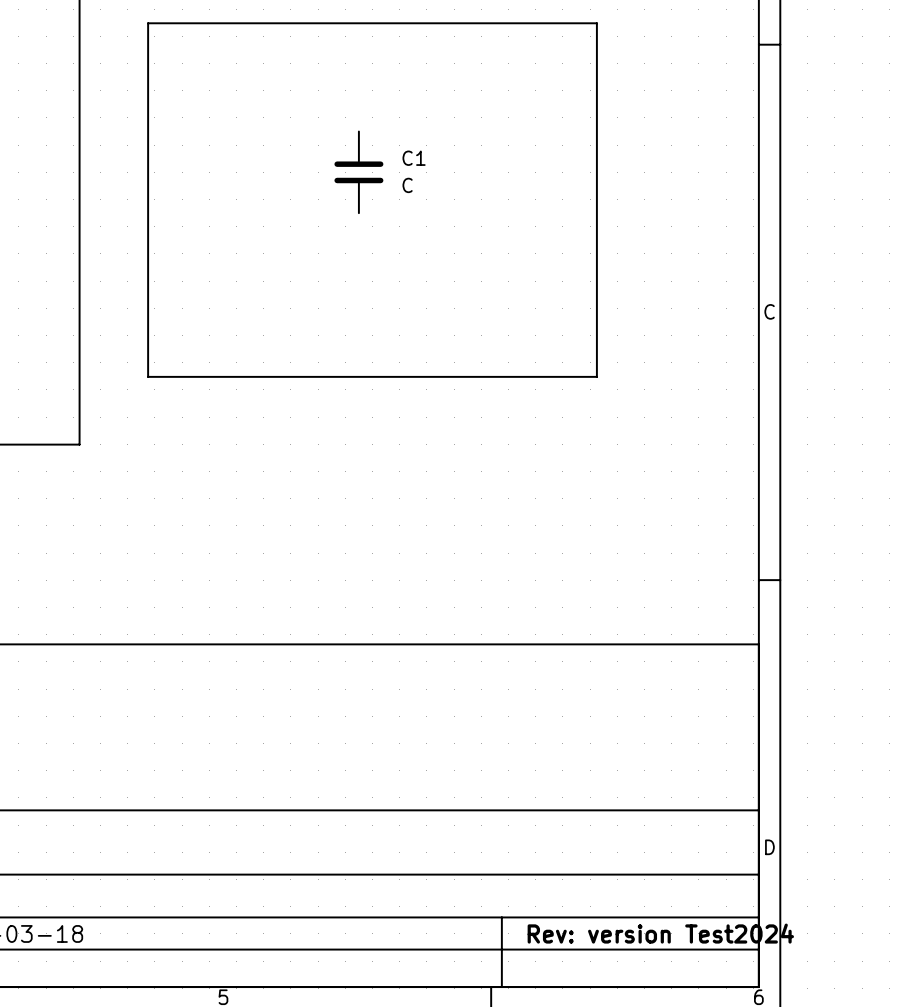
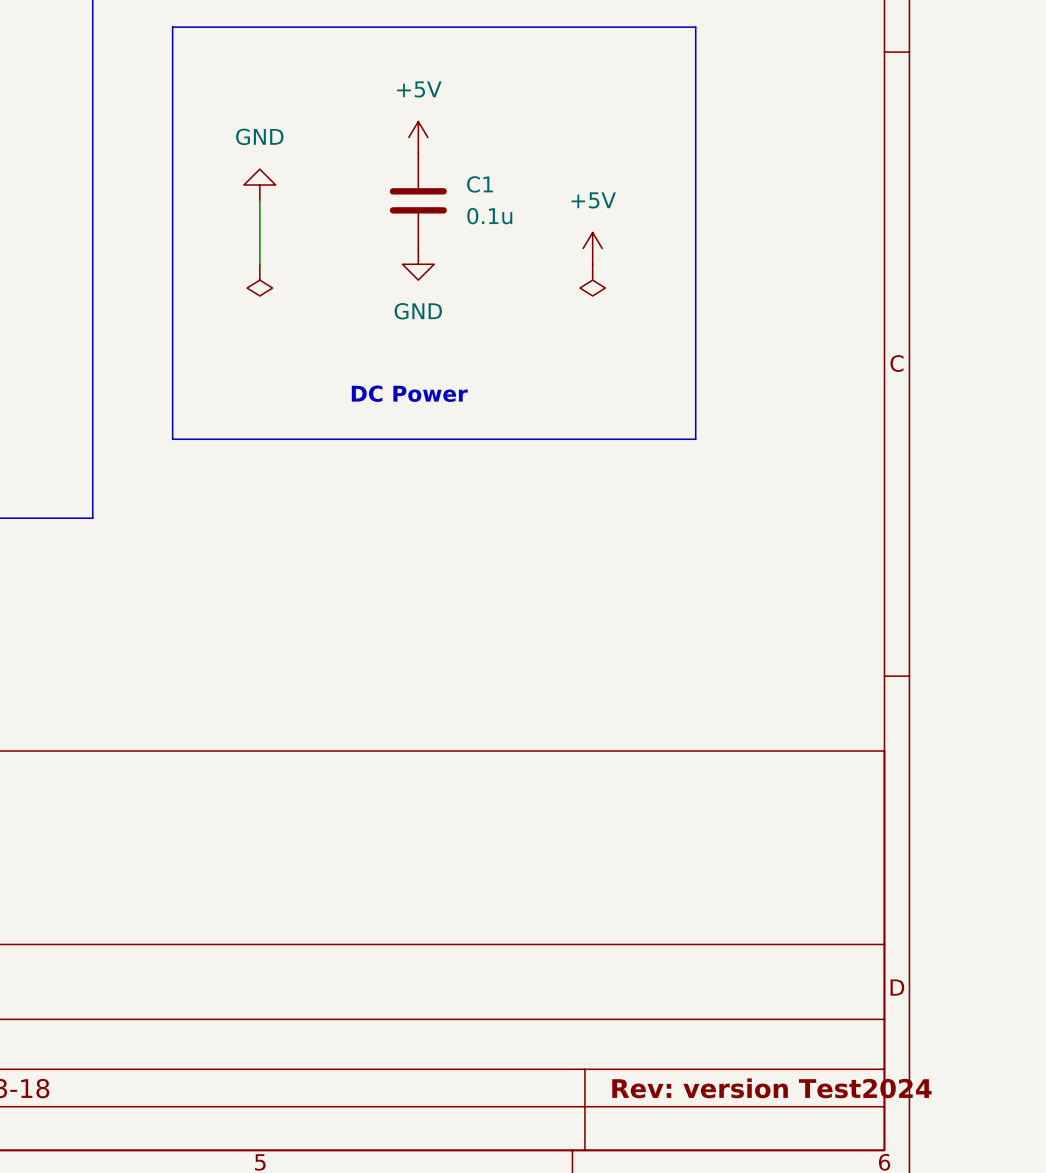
power symbol: none -> +5V (418, 137)
power symbol: none -> GND (259, 185)
wire: none -> (259, 200) (259, 264)
C1 value: C (407, 185) -> 0.1u (489, 216)
power symbol: none -> +5V (592, 248)
power symbol: none -> GND (418, 264)
power symbol: none -> (259, 280)
power symbol: none -> (592, 280)
text: none -> DC Power (409, 393)

